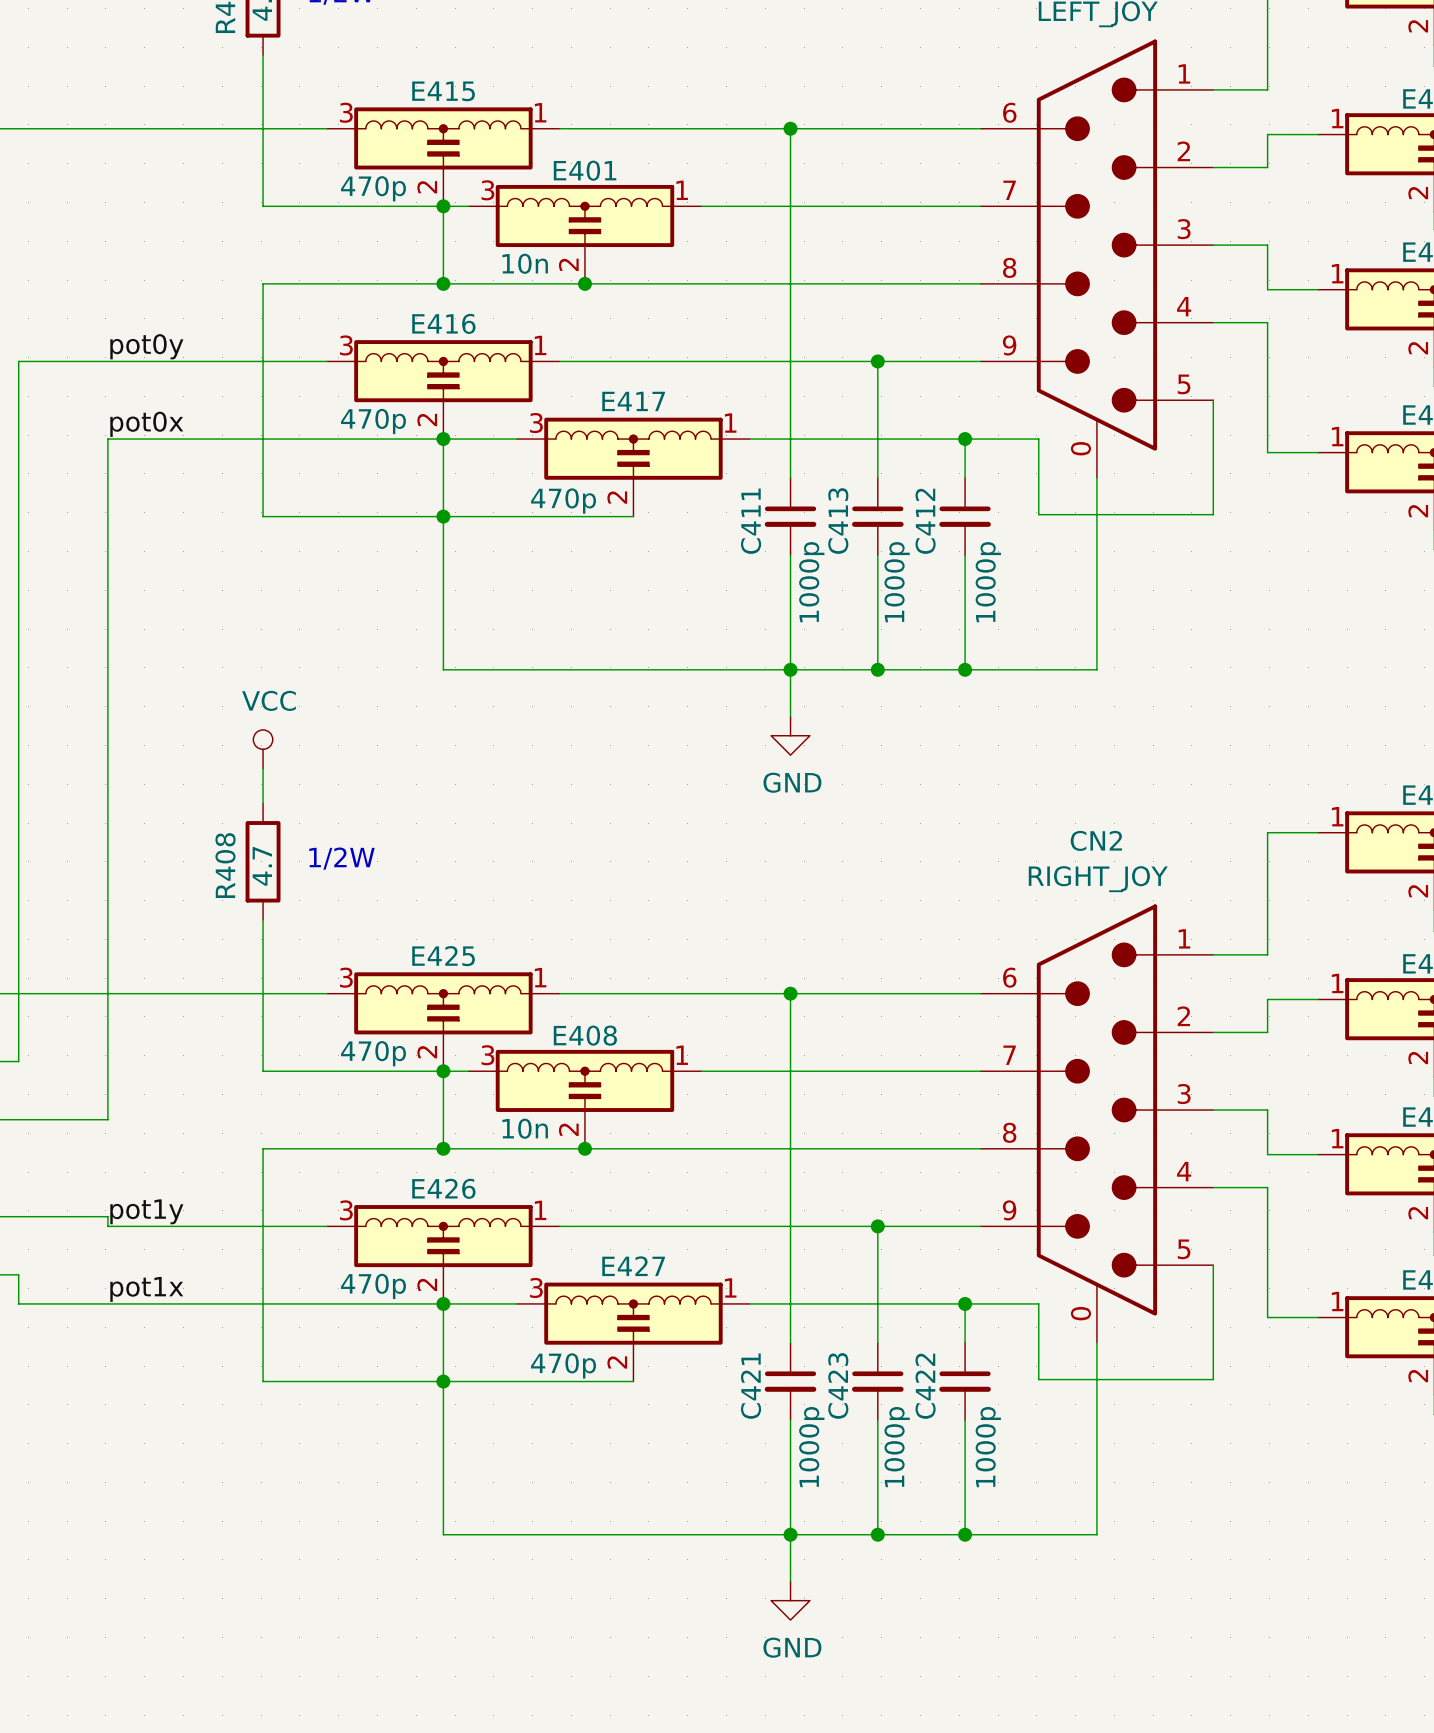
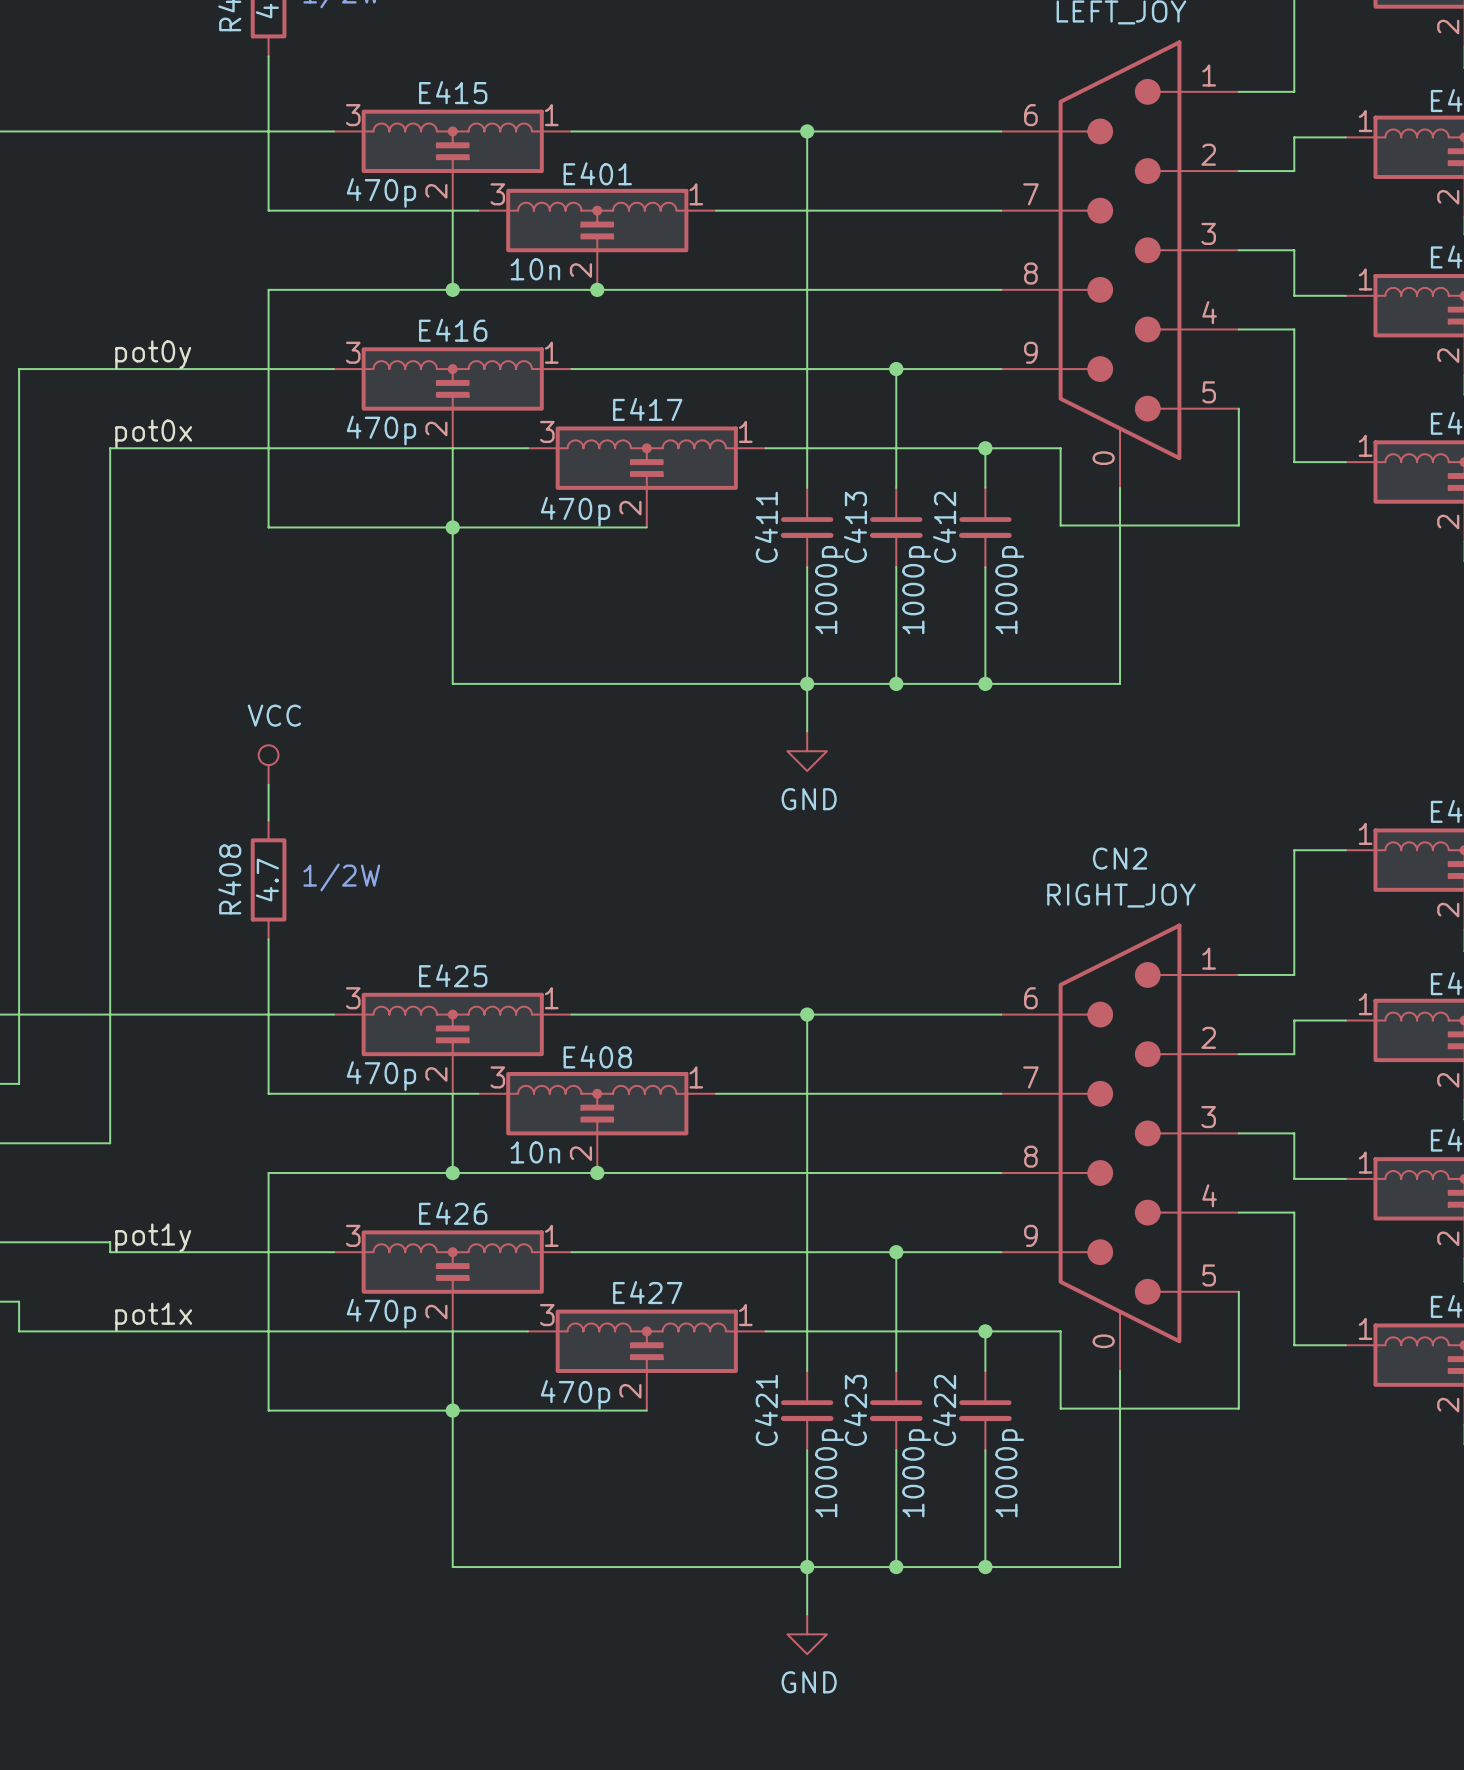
junction: (443, 206) -> none
junction: (443, 439) -> none
junction: (443, 1071) -> none
junction: (443, 1303) -> none

